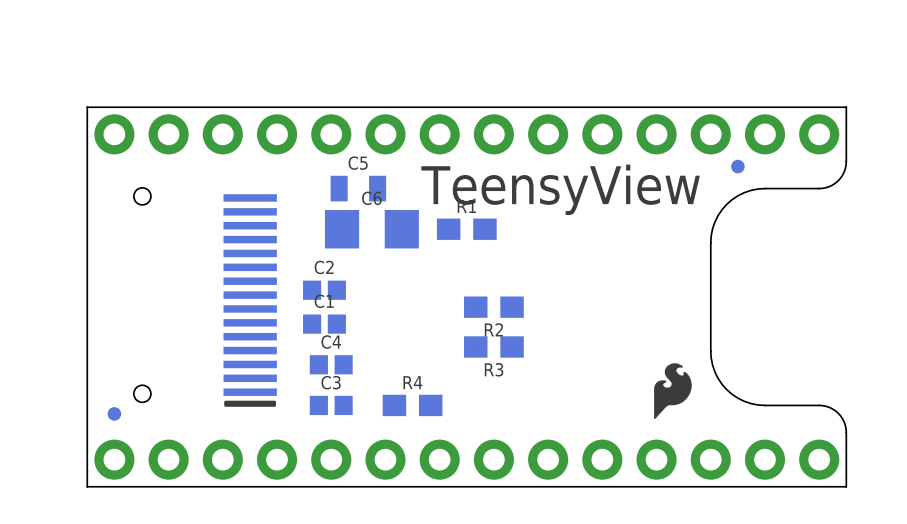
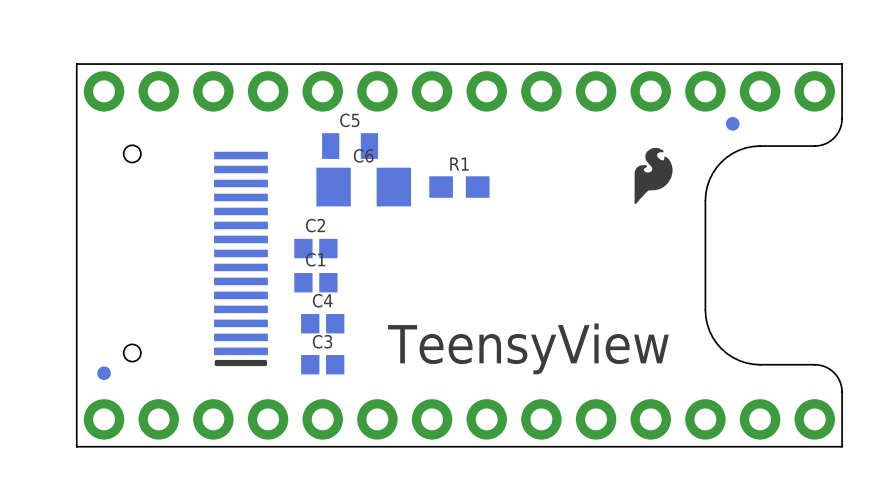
text position: TeensyView (560, 189) -> TeensyView (528, 348)
R2: (493, 307) -> none
R3: (493, 346) -> none
drawing position: (672, 391) -> (653, 175)
R4: (412, 405) -> none

